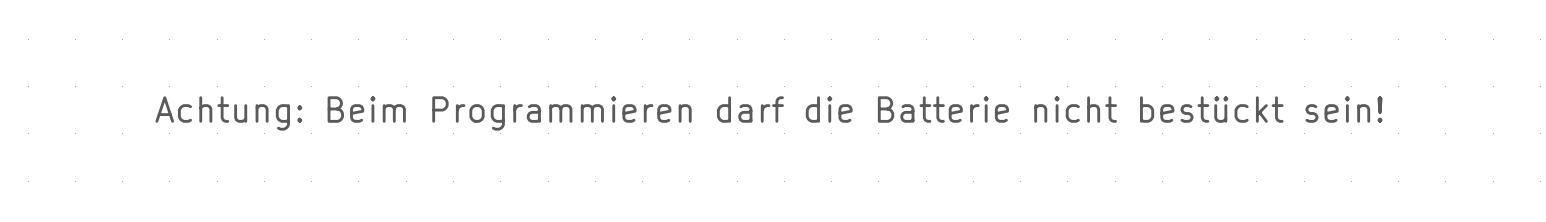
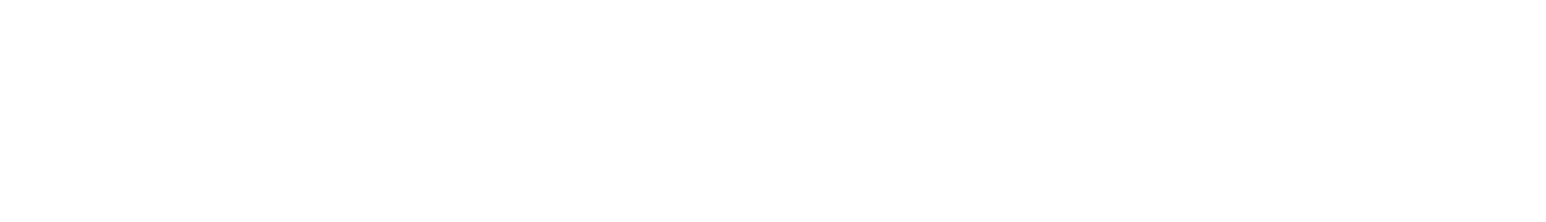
text: Achtung: Beim Programmieren darf die Batterie nicht bestückt sein! (769, 113) -> none

